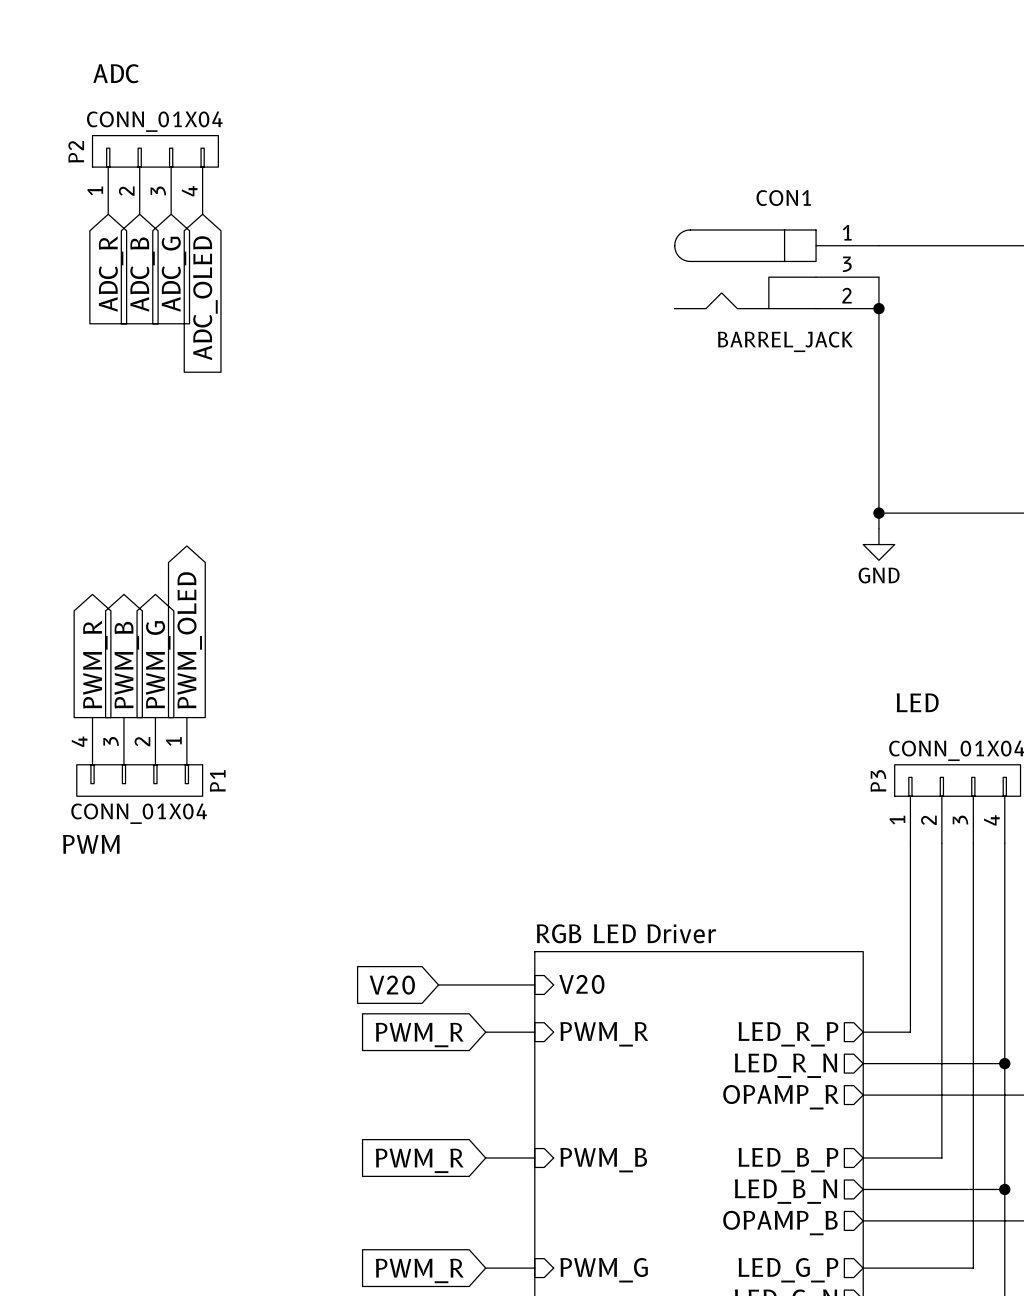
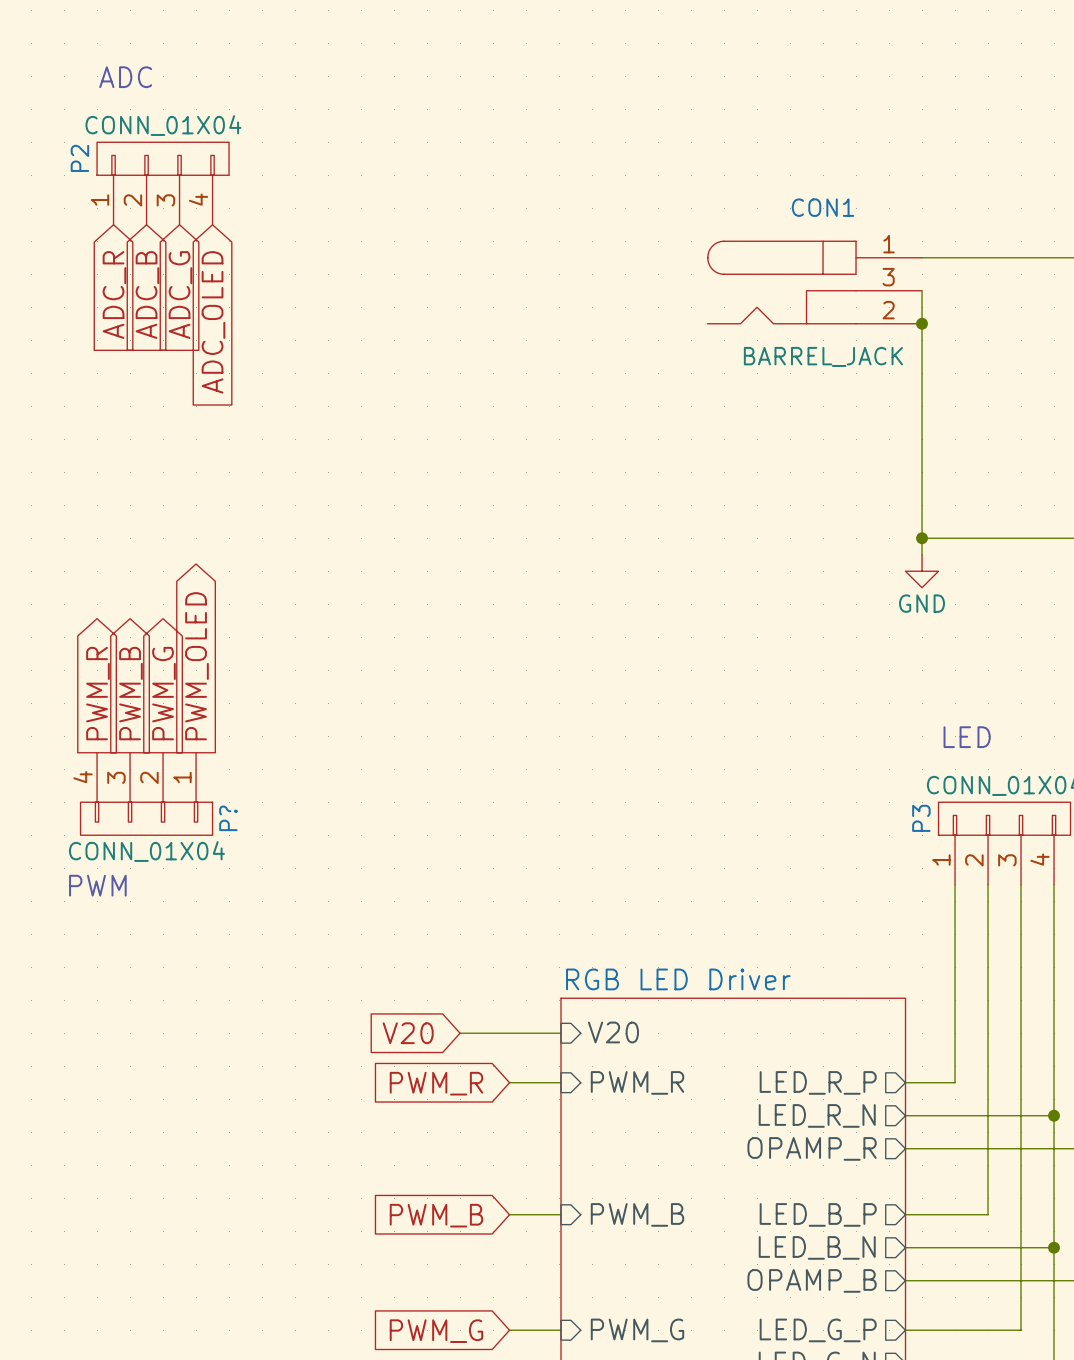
P1 name: P1 (217, 781) -> P? (228, 818)
global label: PWM_R (419, 1160) -> PWM_B (436, 1215)
global label: PWM_R (419, 1270) -> PWM_G (436, 1331)

